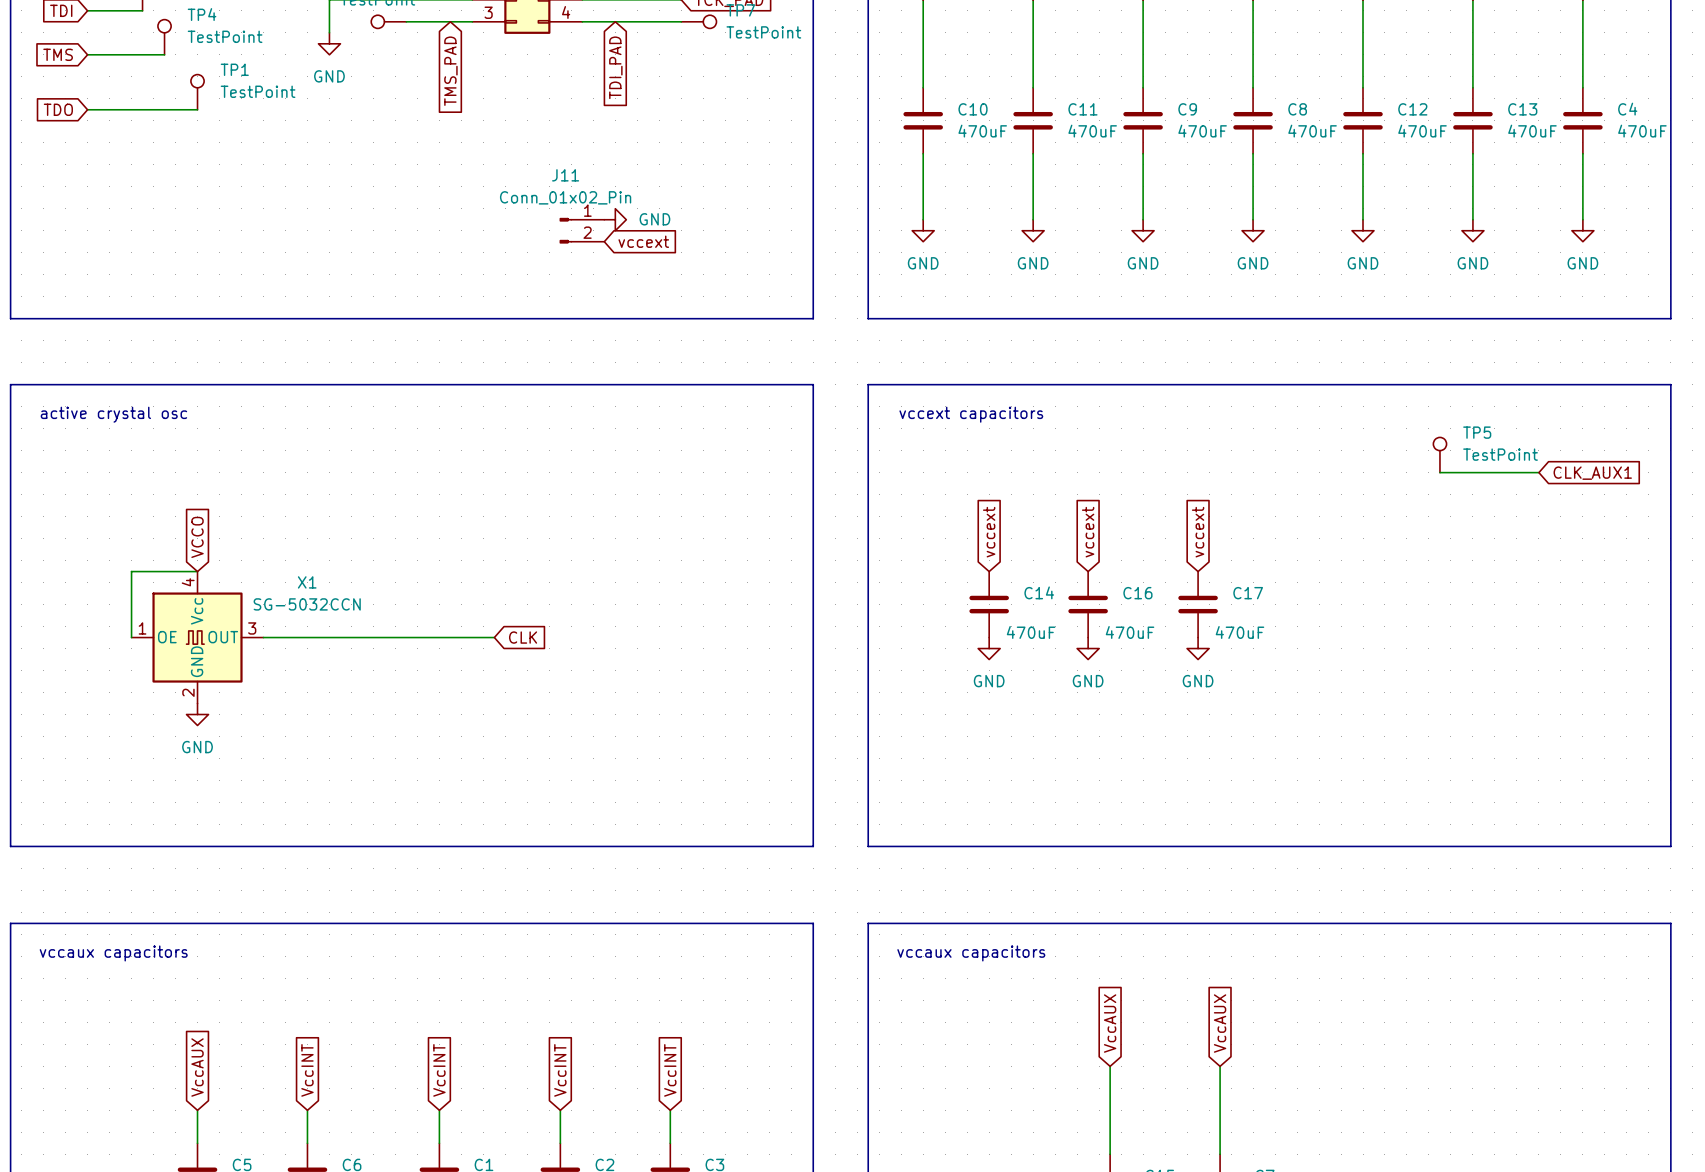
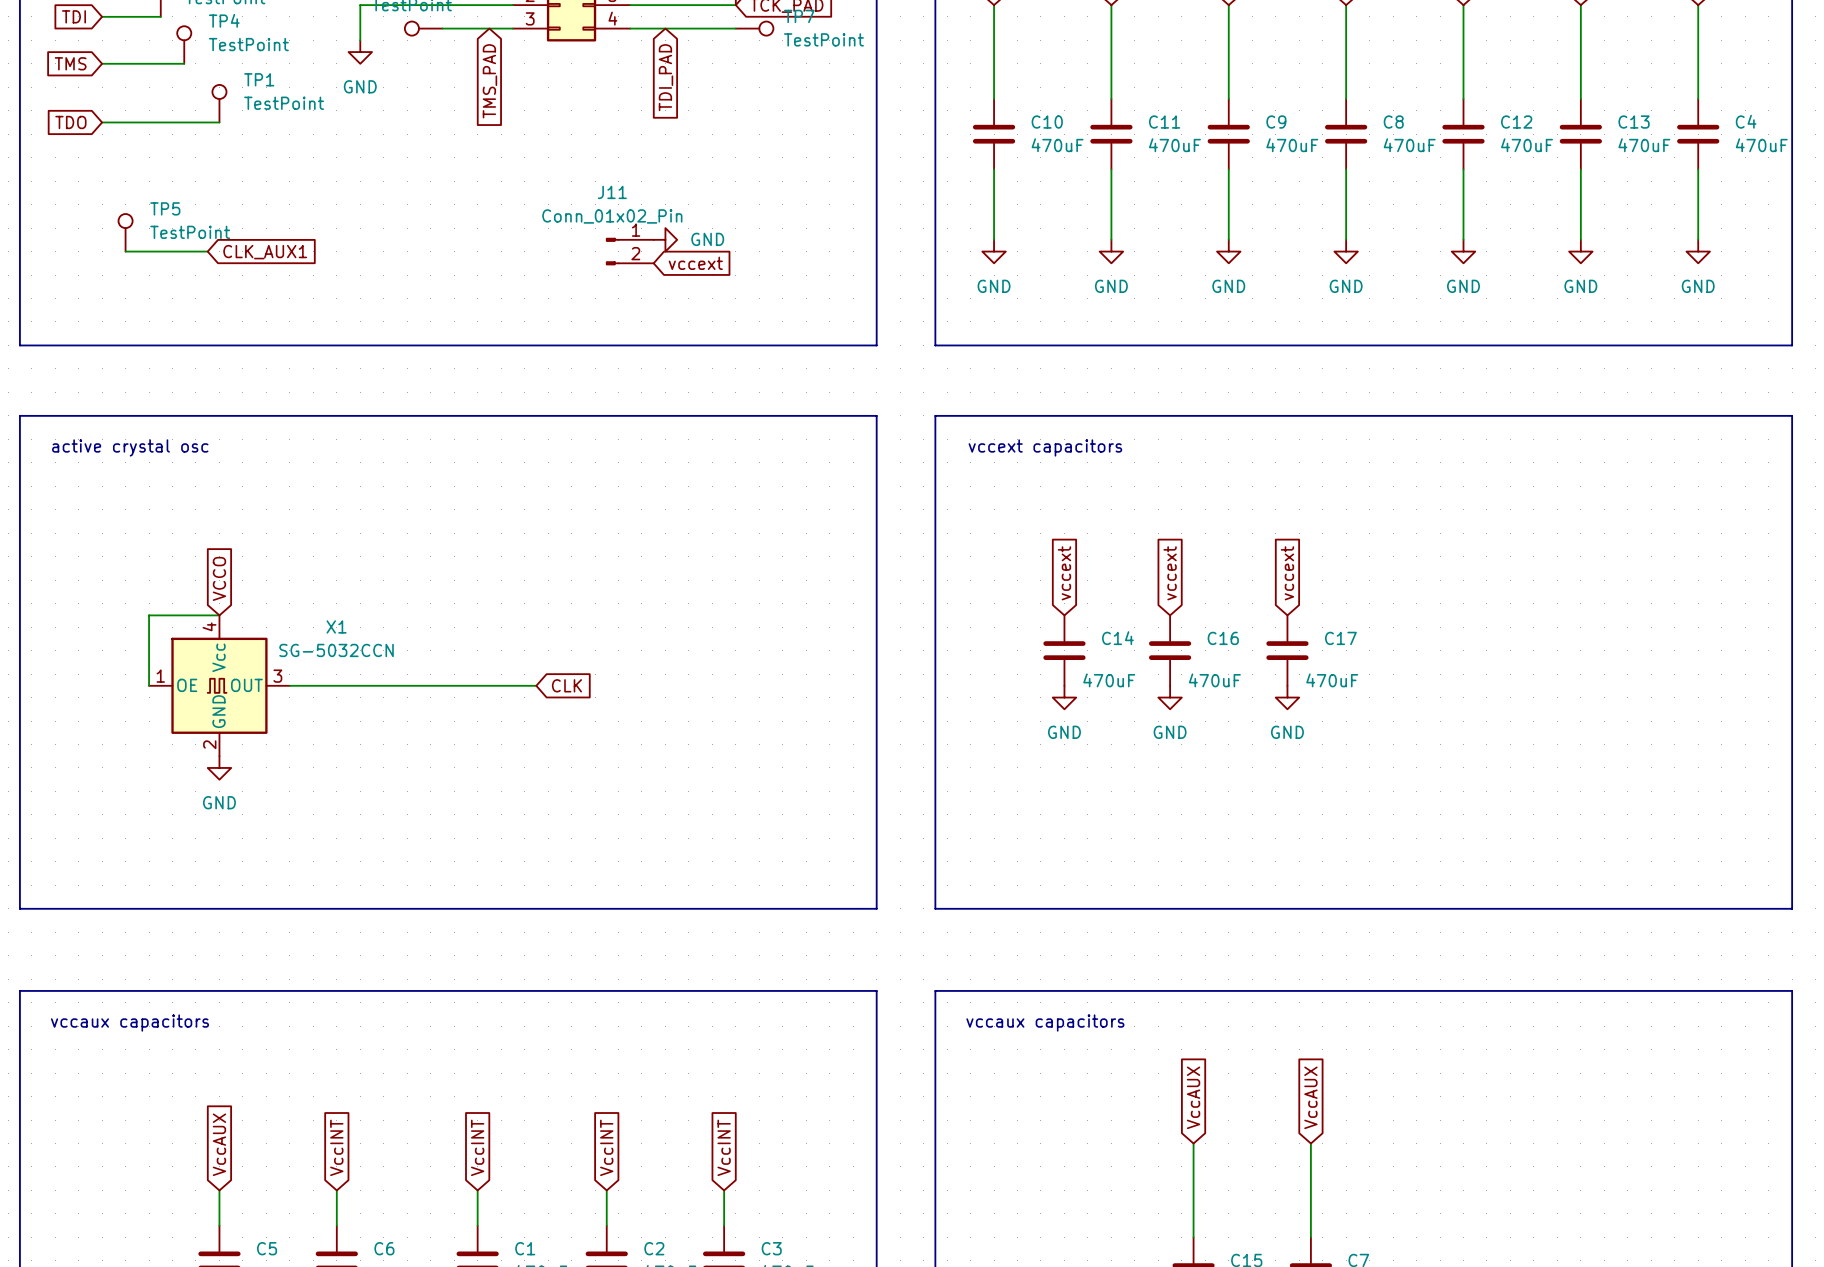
wire: none -> (125, 251) (207, 251)
global label: none -> CLK_AUX1 (265, 252)
TP5 position: (1439, 455) -> (125, 232)
wire: (1439, 472) (1538, 472) -> none
global label: CLK_AUX1 (1592, 473) -> none

